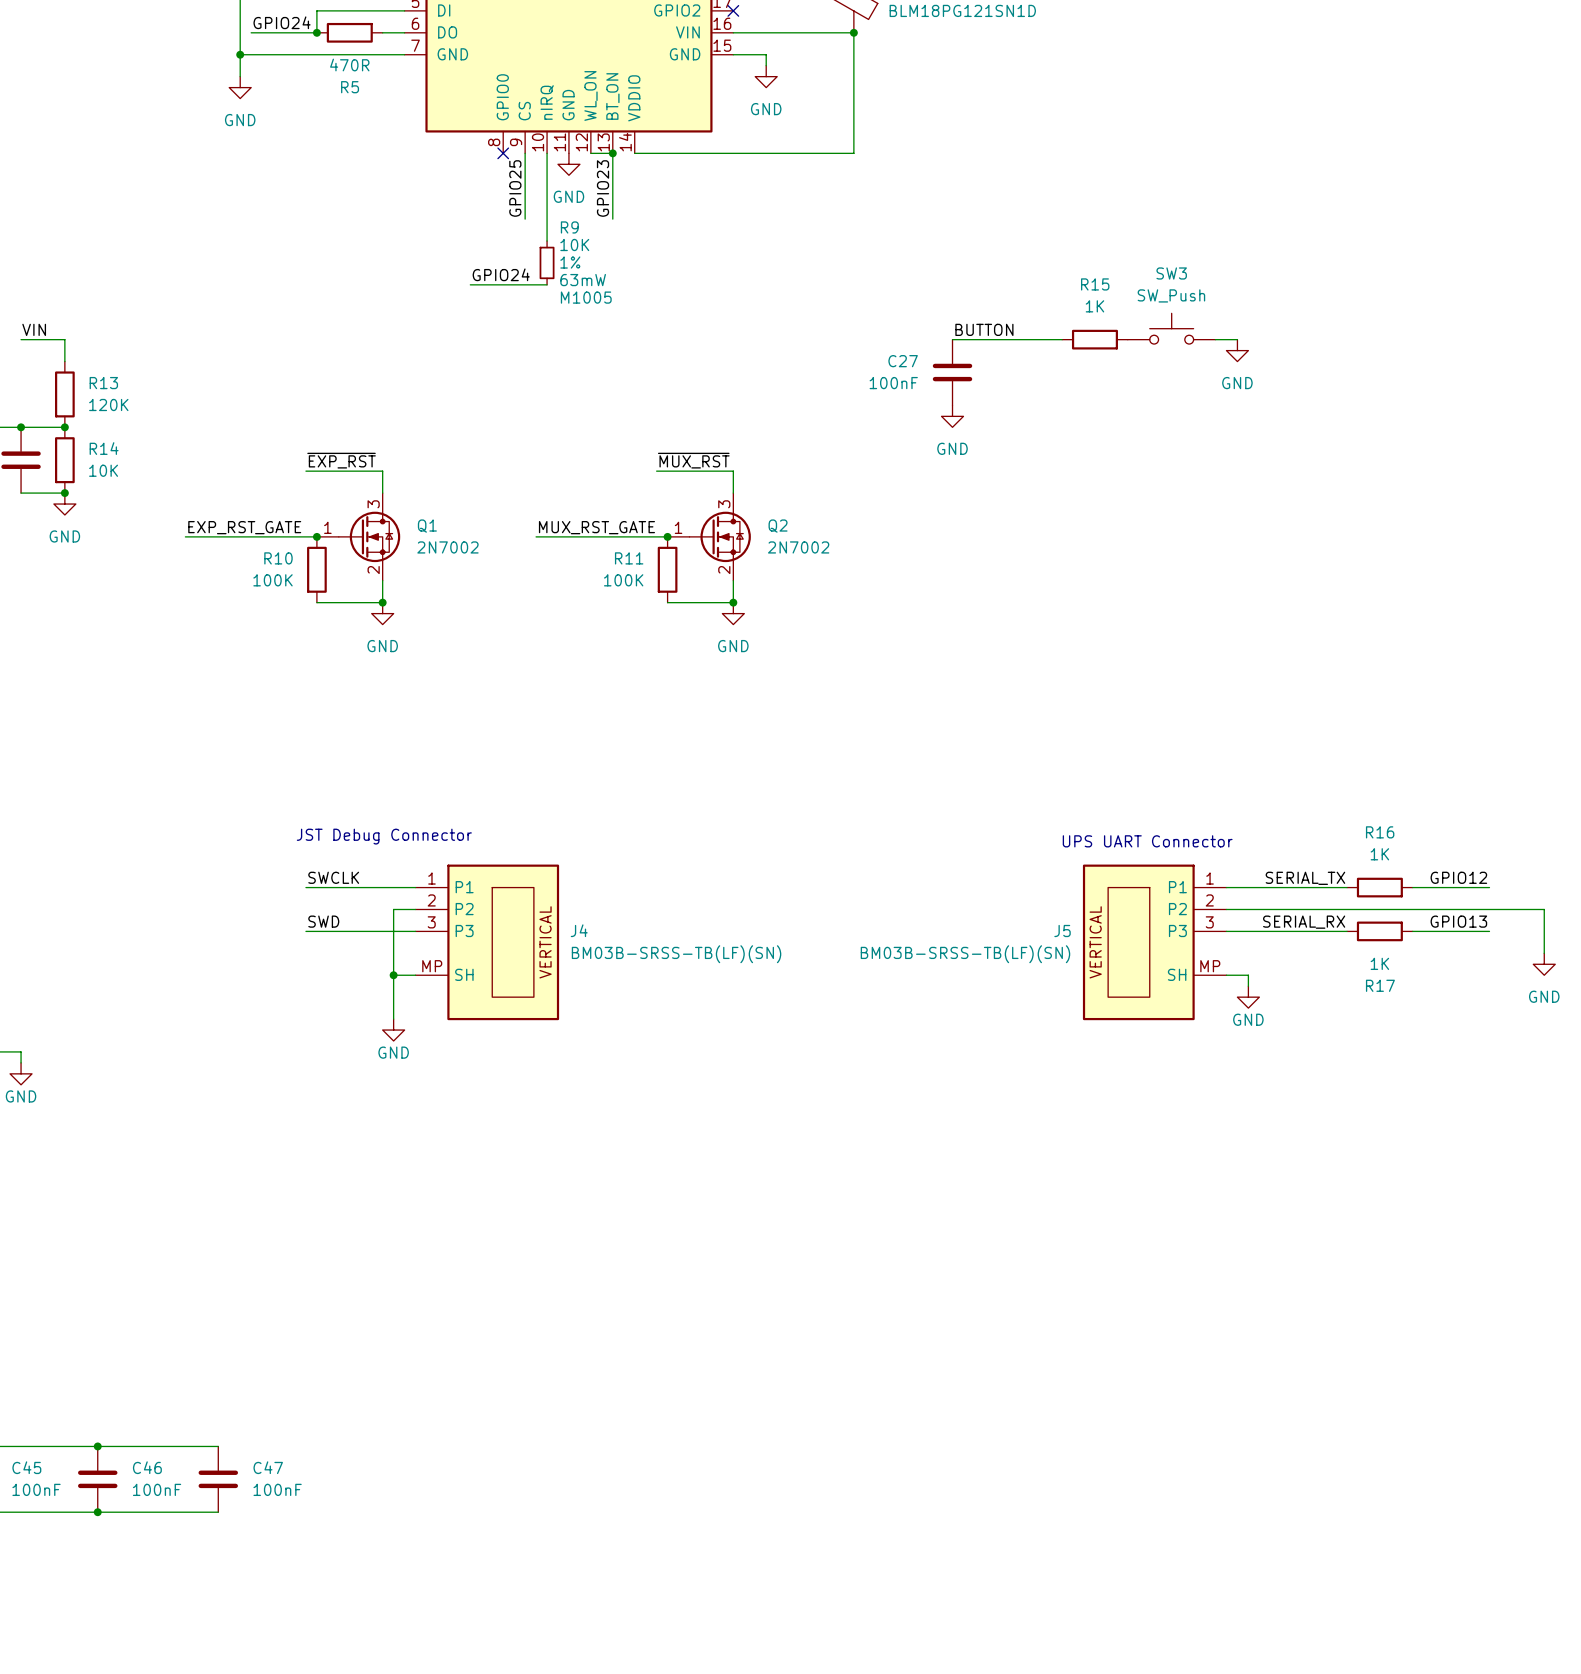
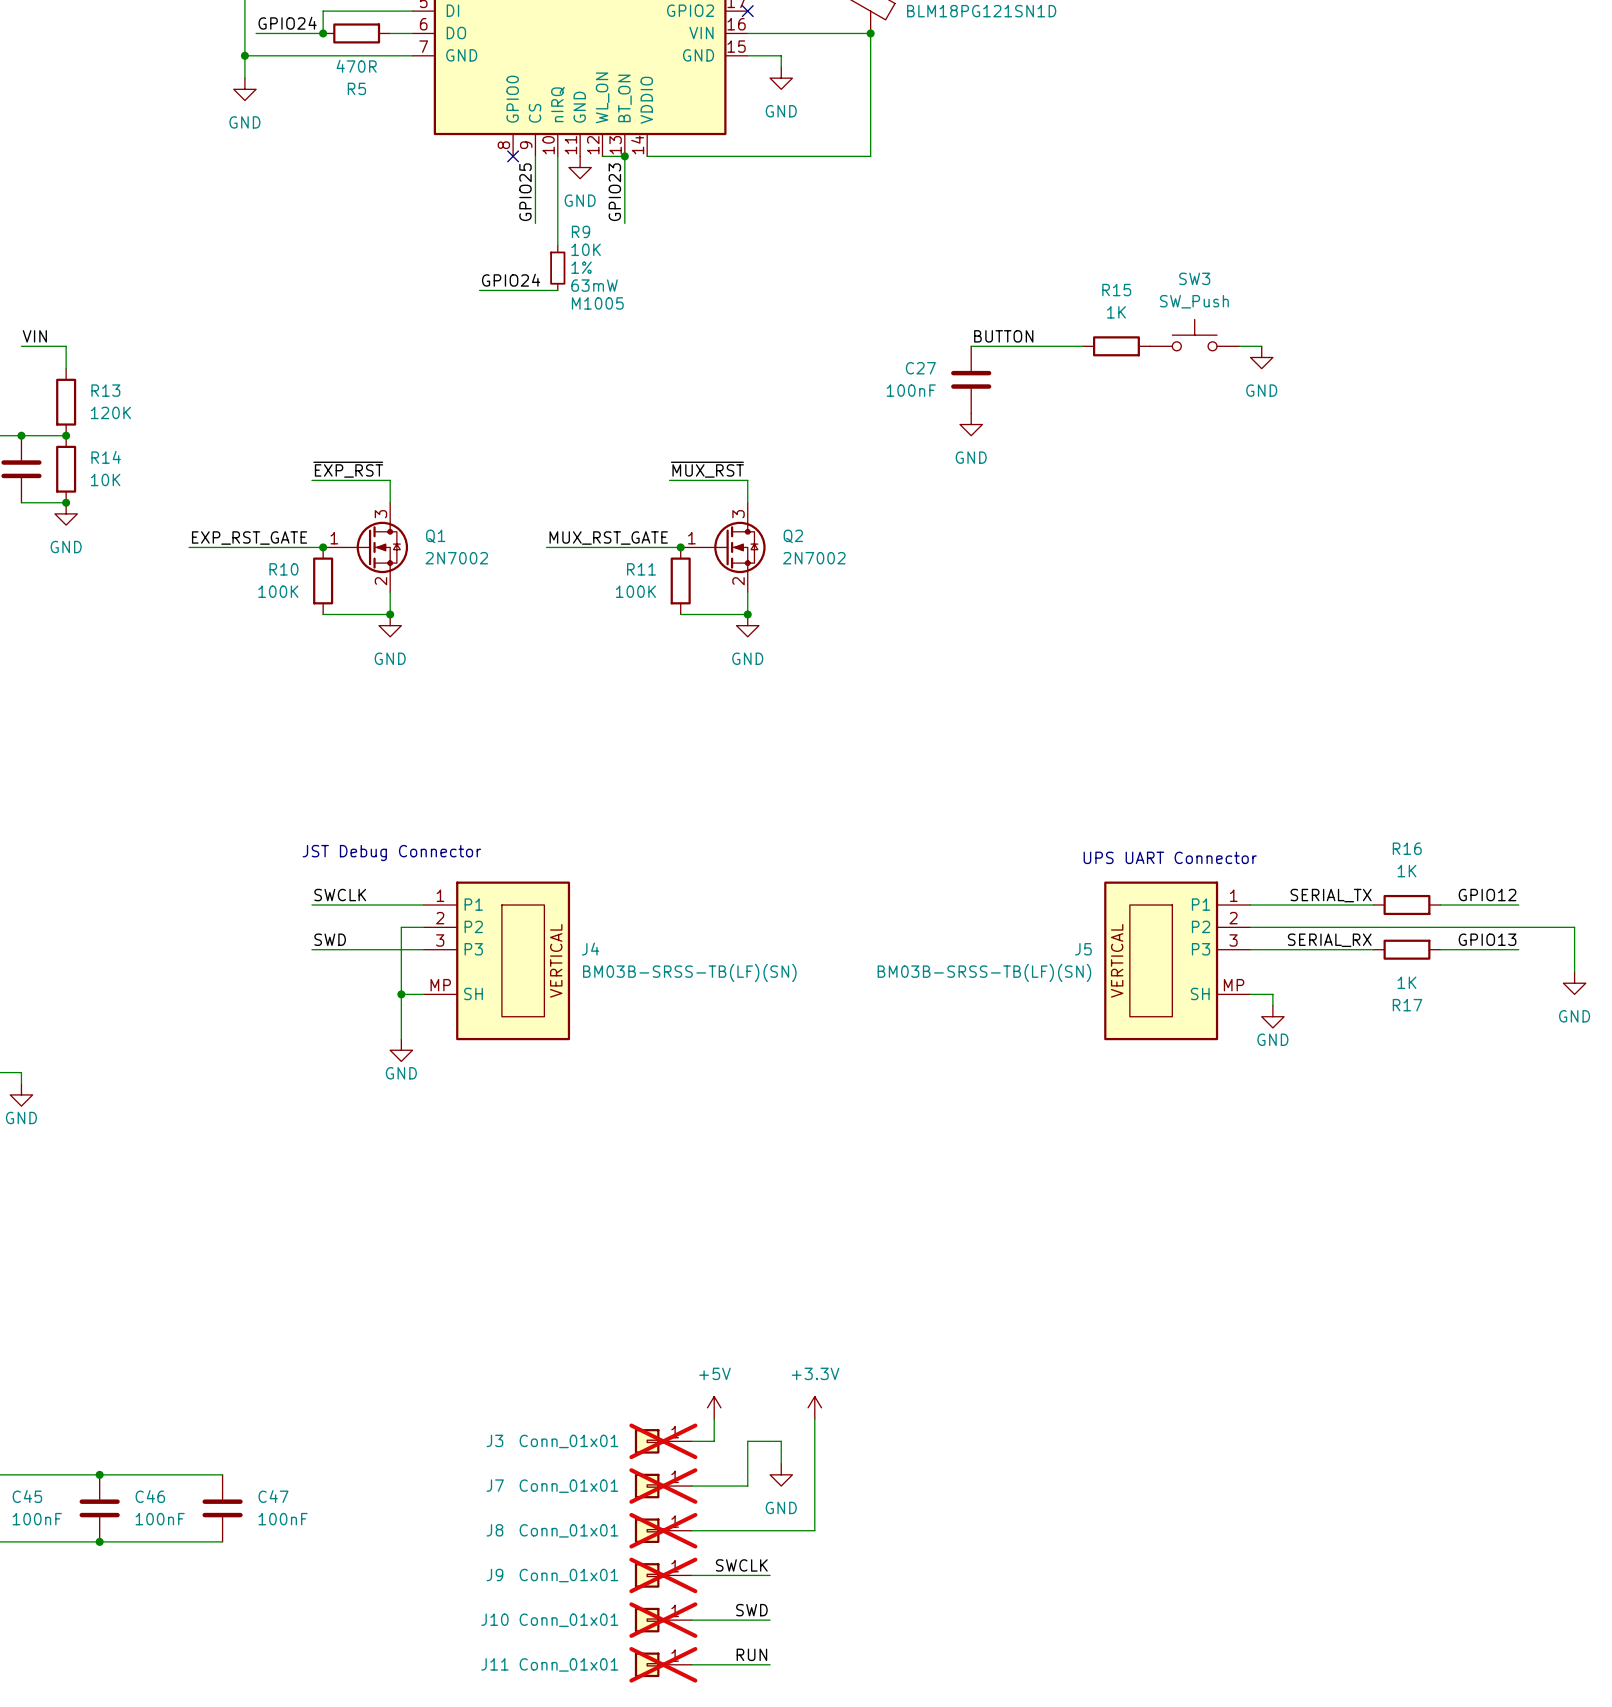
power symbol: none -> +5V (714, 1407)
power symbol: none -> +3.3V (814, 1407)
wire: none -> (714, 1418) (714, 1441) (691, 1441)
wire: none -> (814, 1418) (814, 1530) (691, 1530)
J3: none -> Conn_01x01 (663, 1441)
wire: none -> (781, 1463) (781, 1441) (747, 1441) (747, 1486) (691, 1486)
power symbol: none -> GND (781, 1474)
J7: none -> Conn_01x01 (663, 1486)
J8: none -> Conn_01x01 (663, 1530)
label: none -> SWCLK (741, 1565)
J9: none -> Conn_01x01 (663, 1575)
wire: none -> (691, 1575) (770, 1575)
label: none -> SWD (751, 1610)
J10: none -> Conn_01x01 (663, 1620)
wire: none -> (691, 1620) (770, 1620)
label: none -> RUN (751, 1654)
J11: none -> Conn_01x01 (663, 1664)
wire: none -> (691, 1664) (770, 1664)

